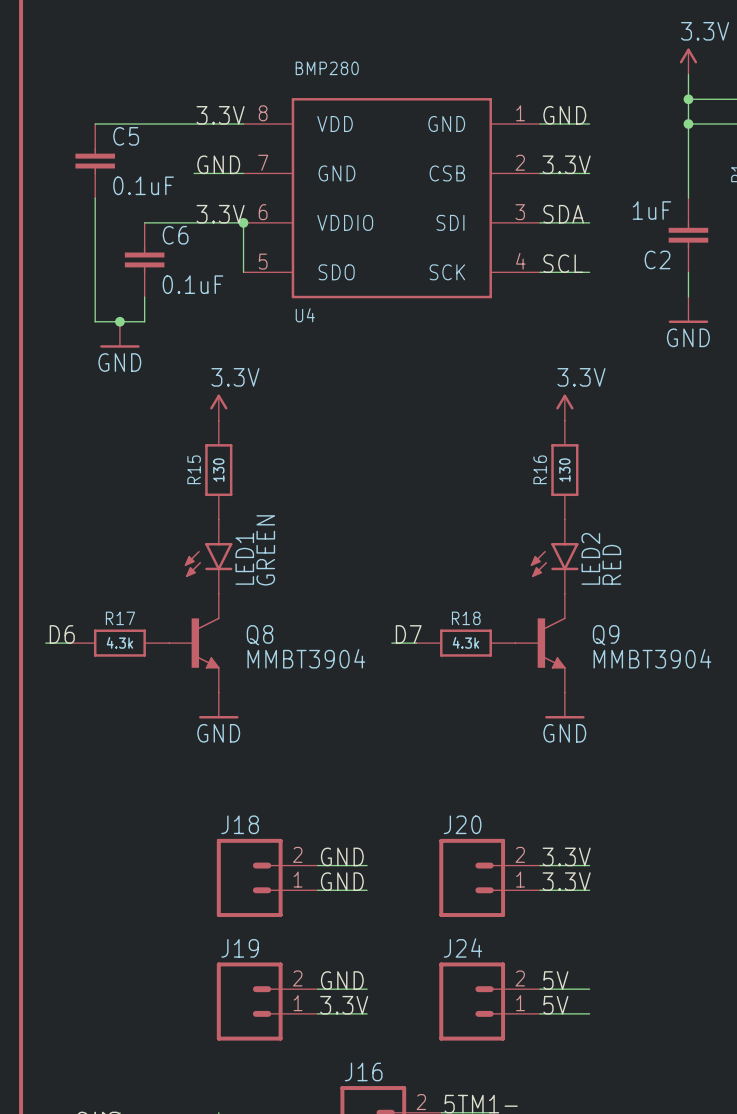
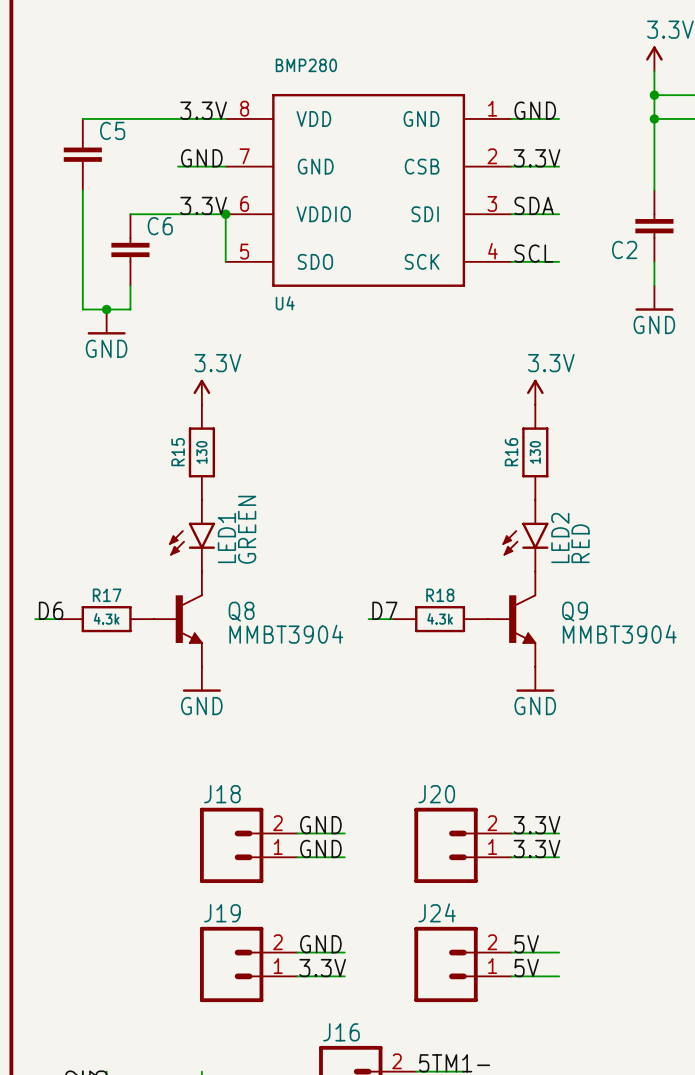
C5 value: 0.1uF (143, 185) -> none
C2 value: 1uF (651, 210) -> none
C6 value: 0.1uF (193, 284) -> none

